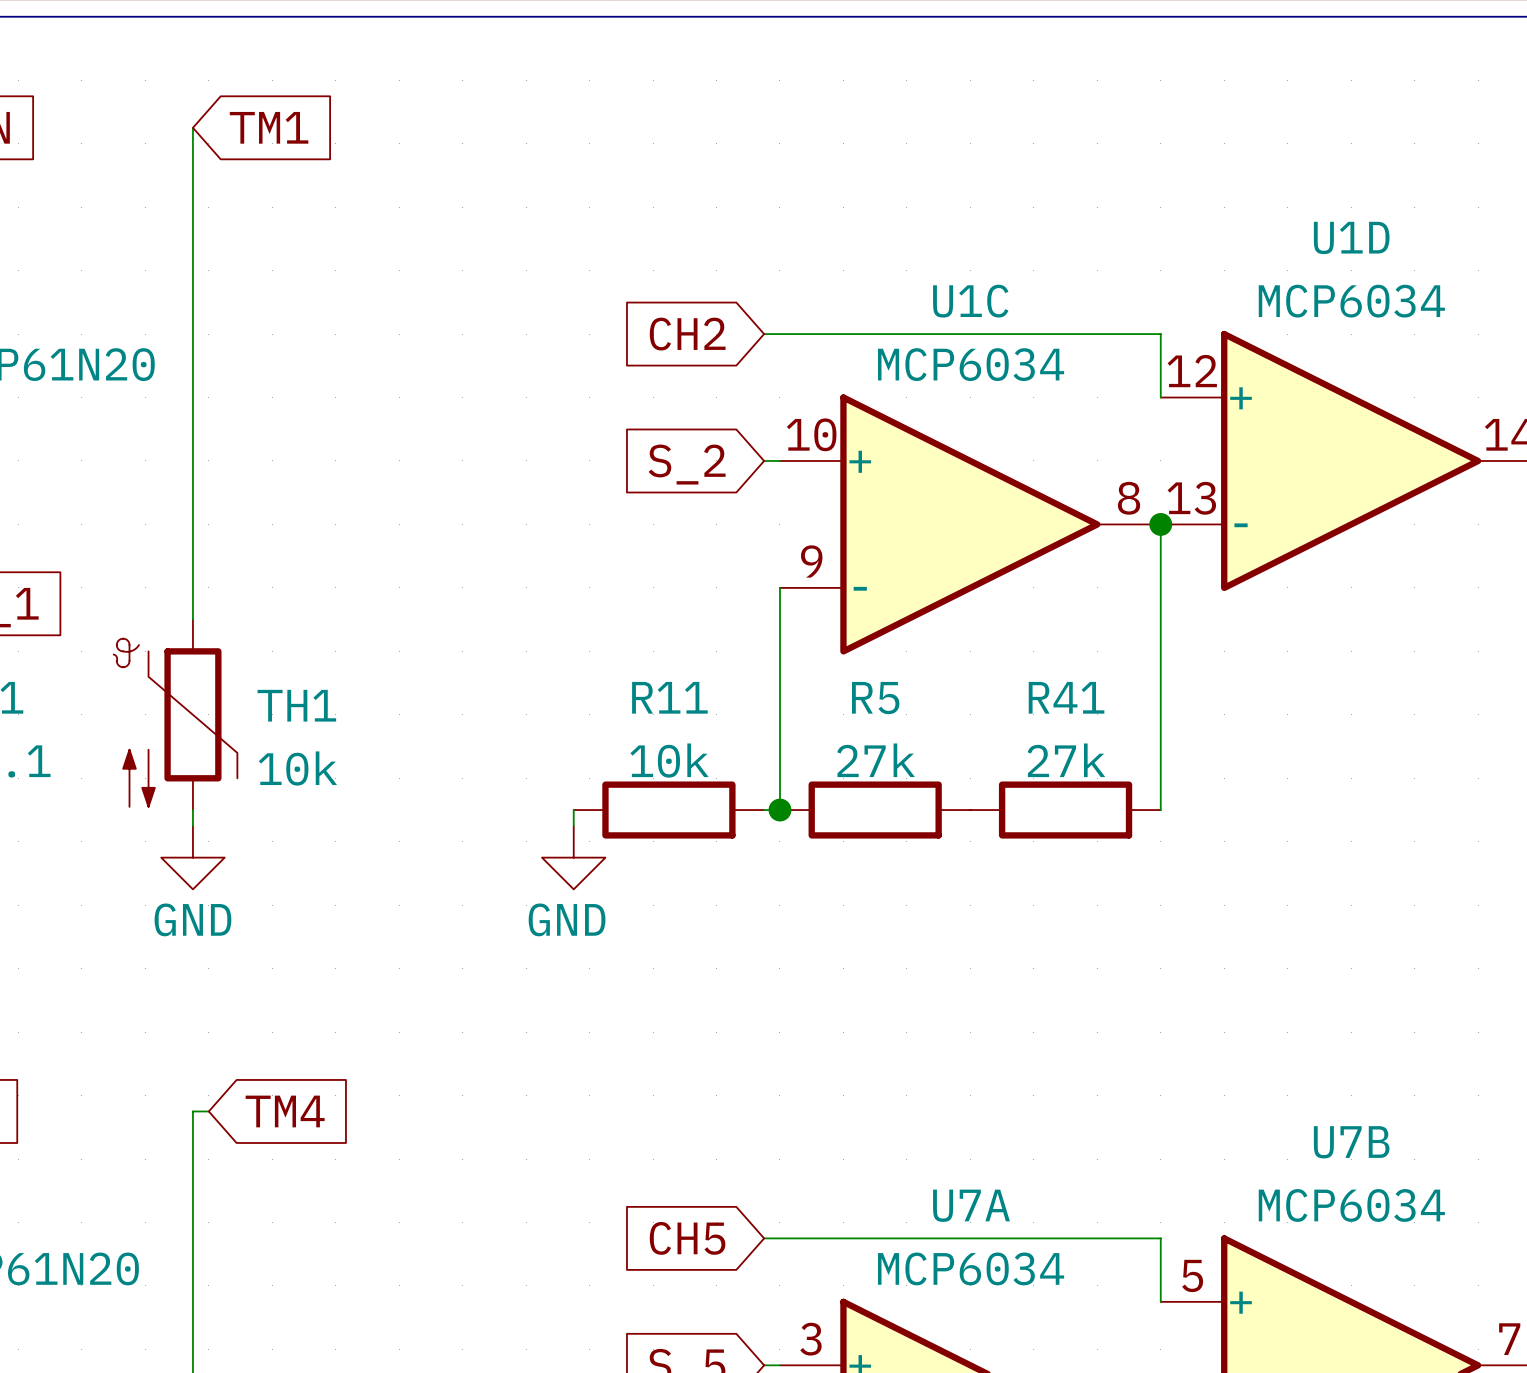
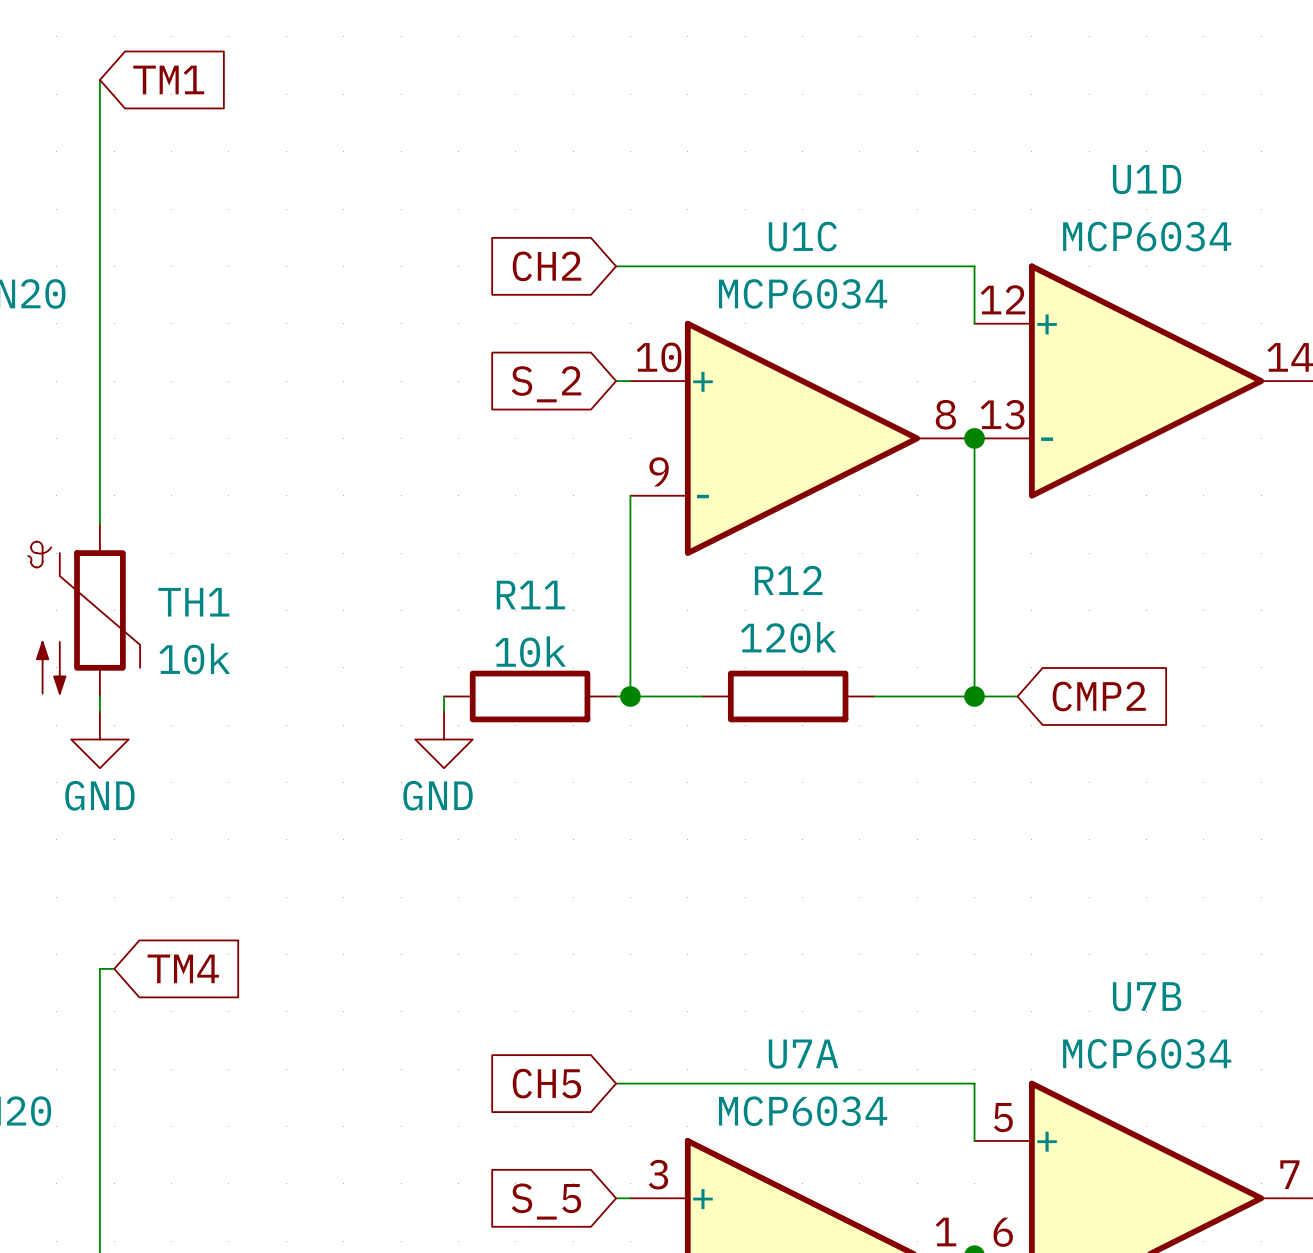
wire: none -> (630, 696) (702, 696)
R5: 27k (875, 810) -> none
R12: none -> 120k (788, 696)
wire: none -> (874, 696) (1017, 696)
R41: 27k (1065, 810) -> none
junction: none -> (974, 696)
global label: none -> CMP2 (1099, 696)

